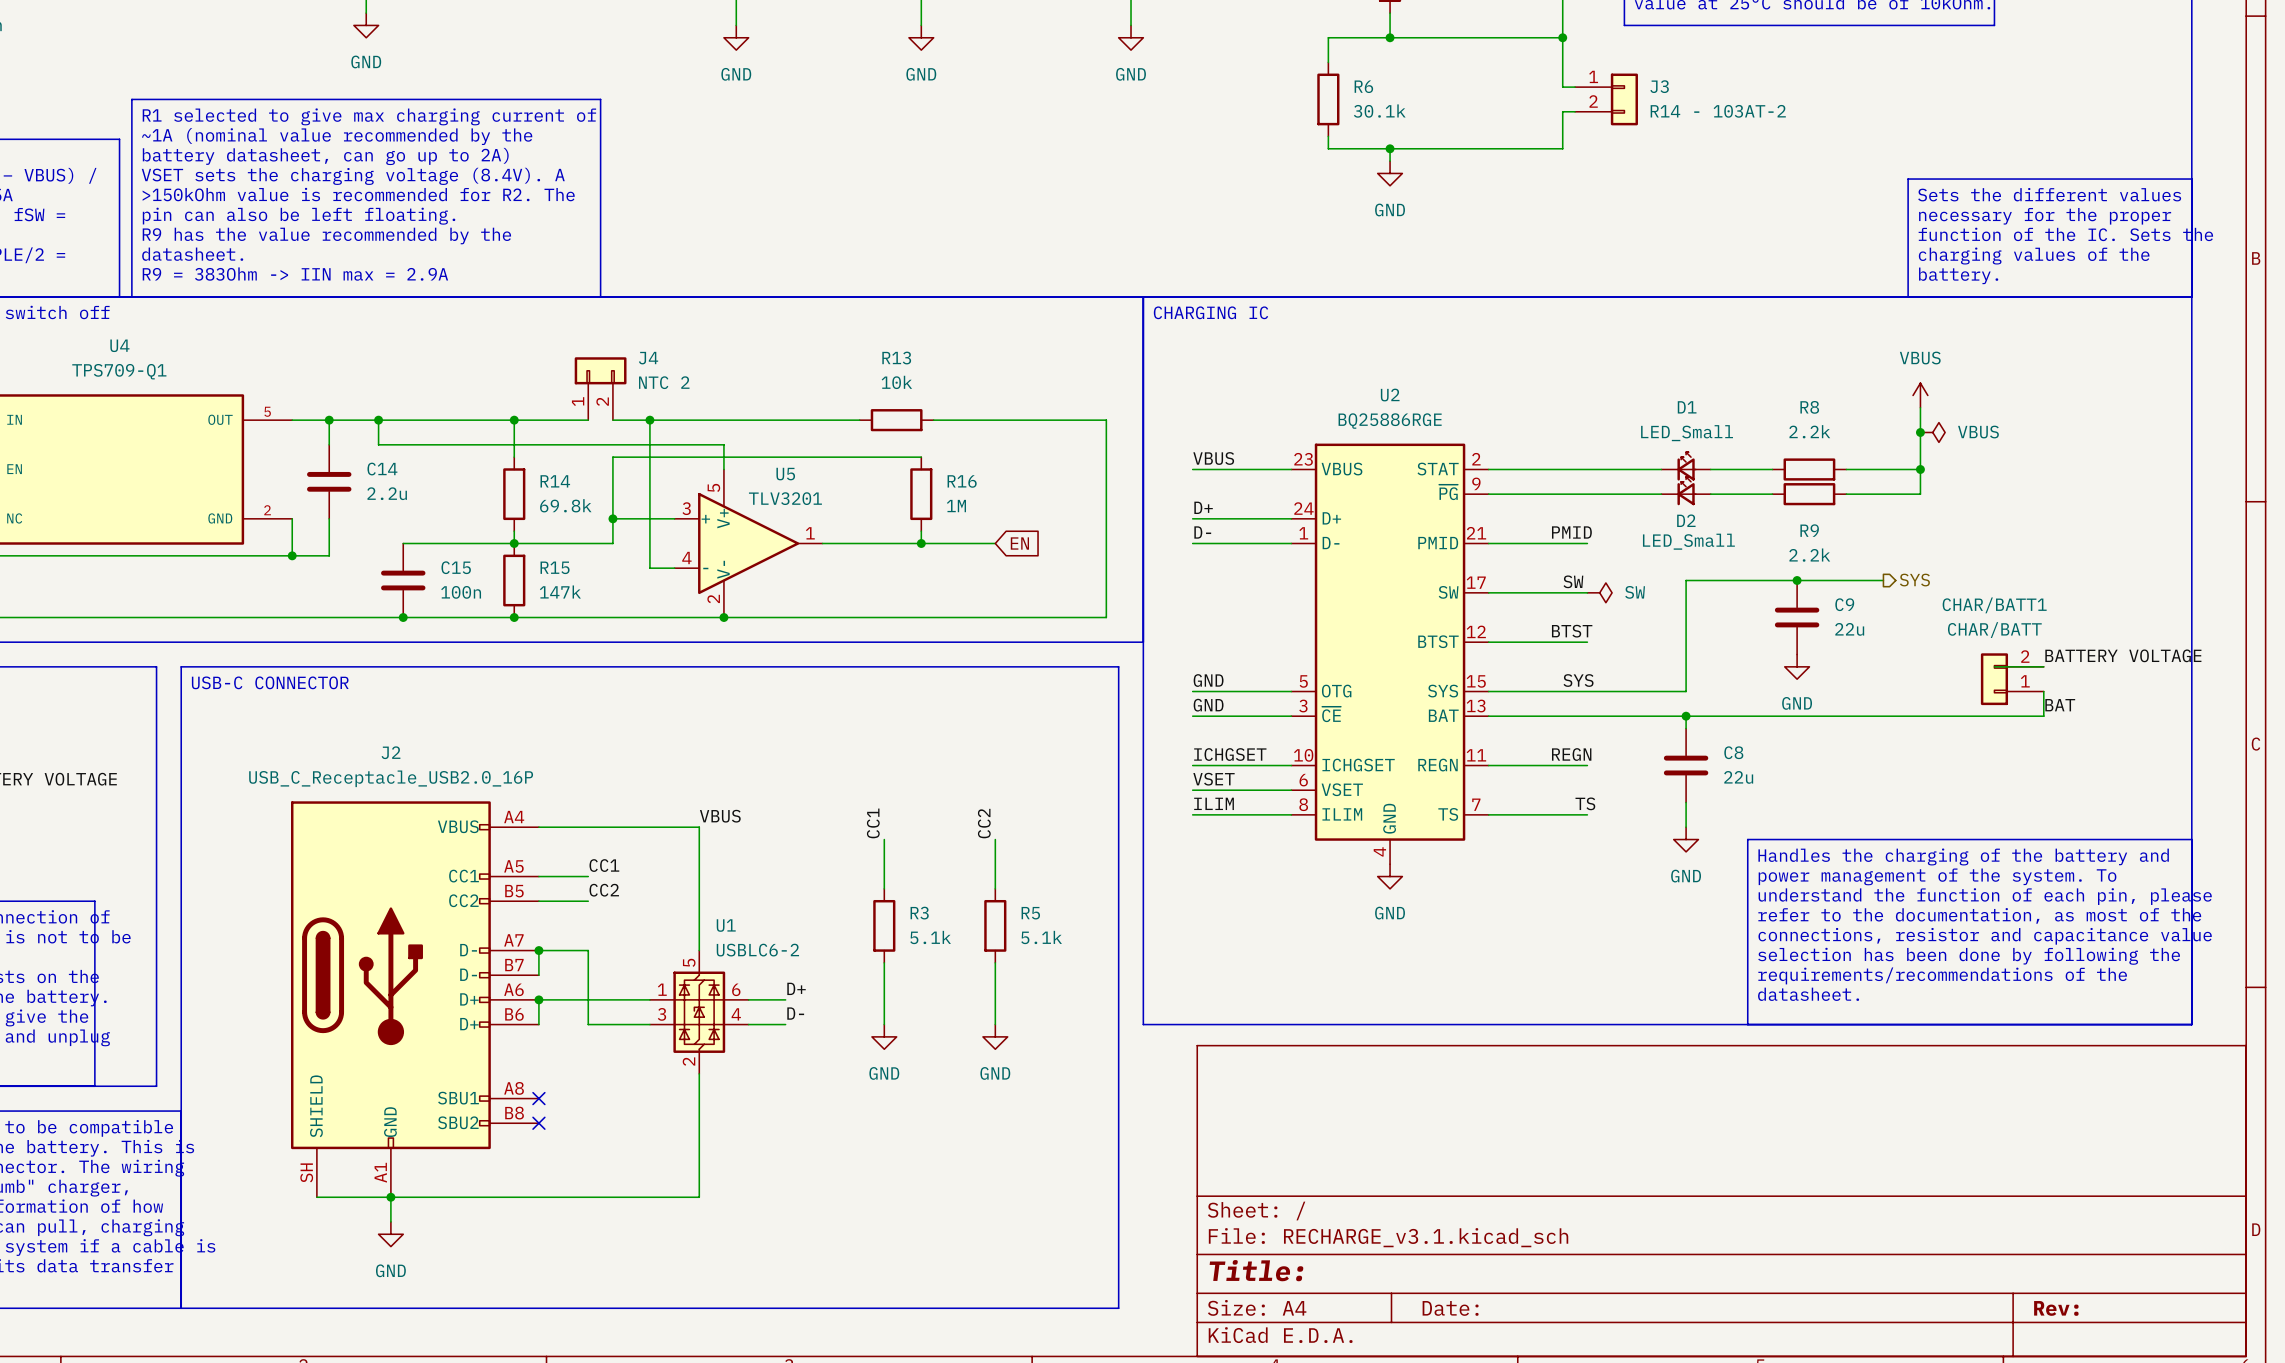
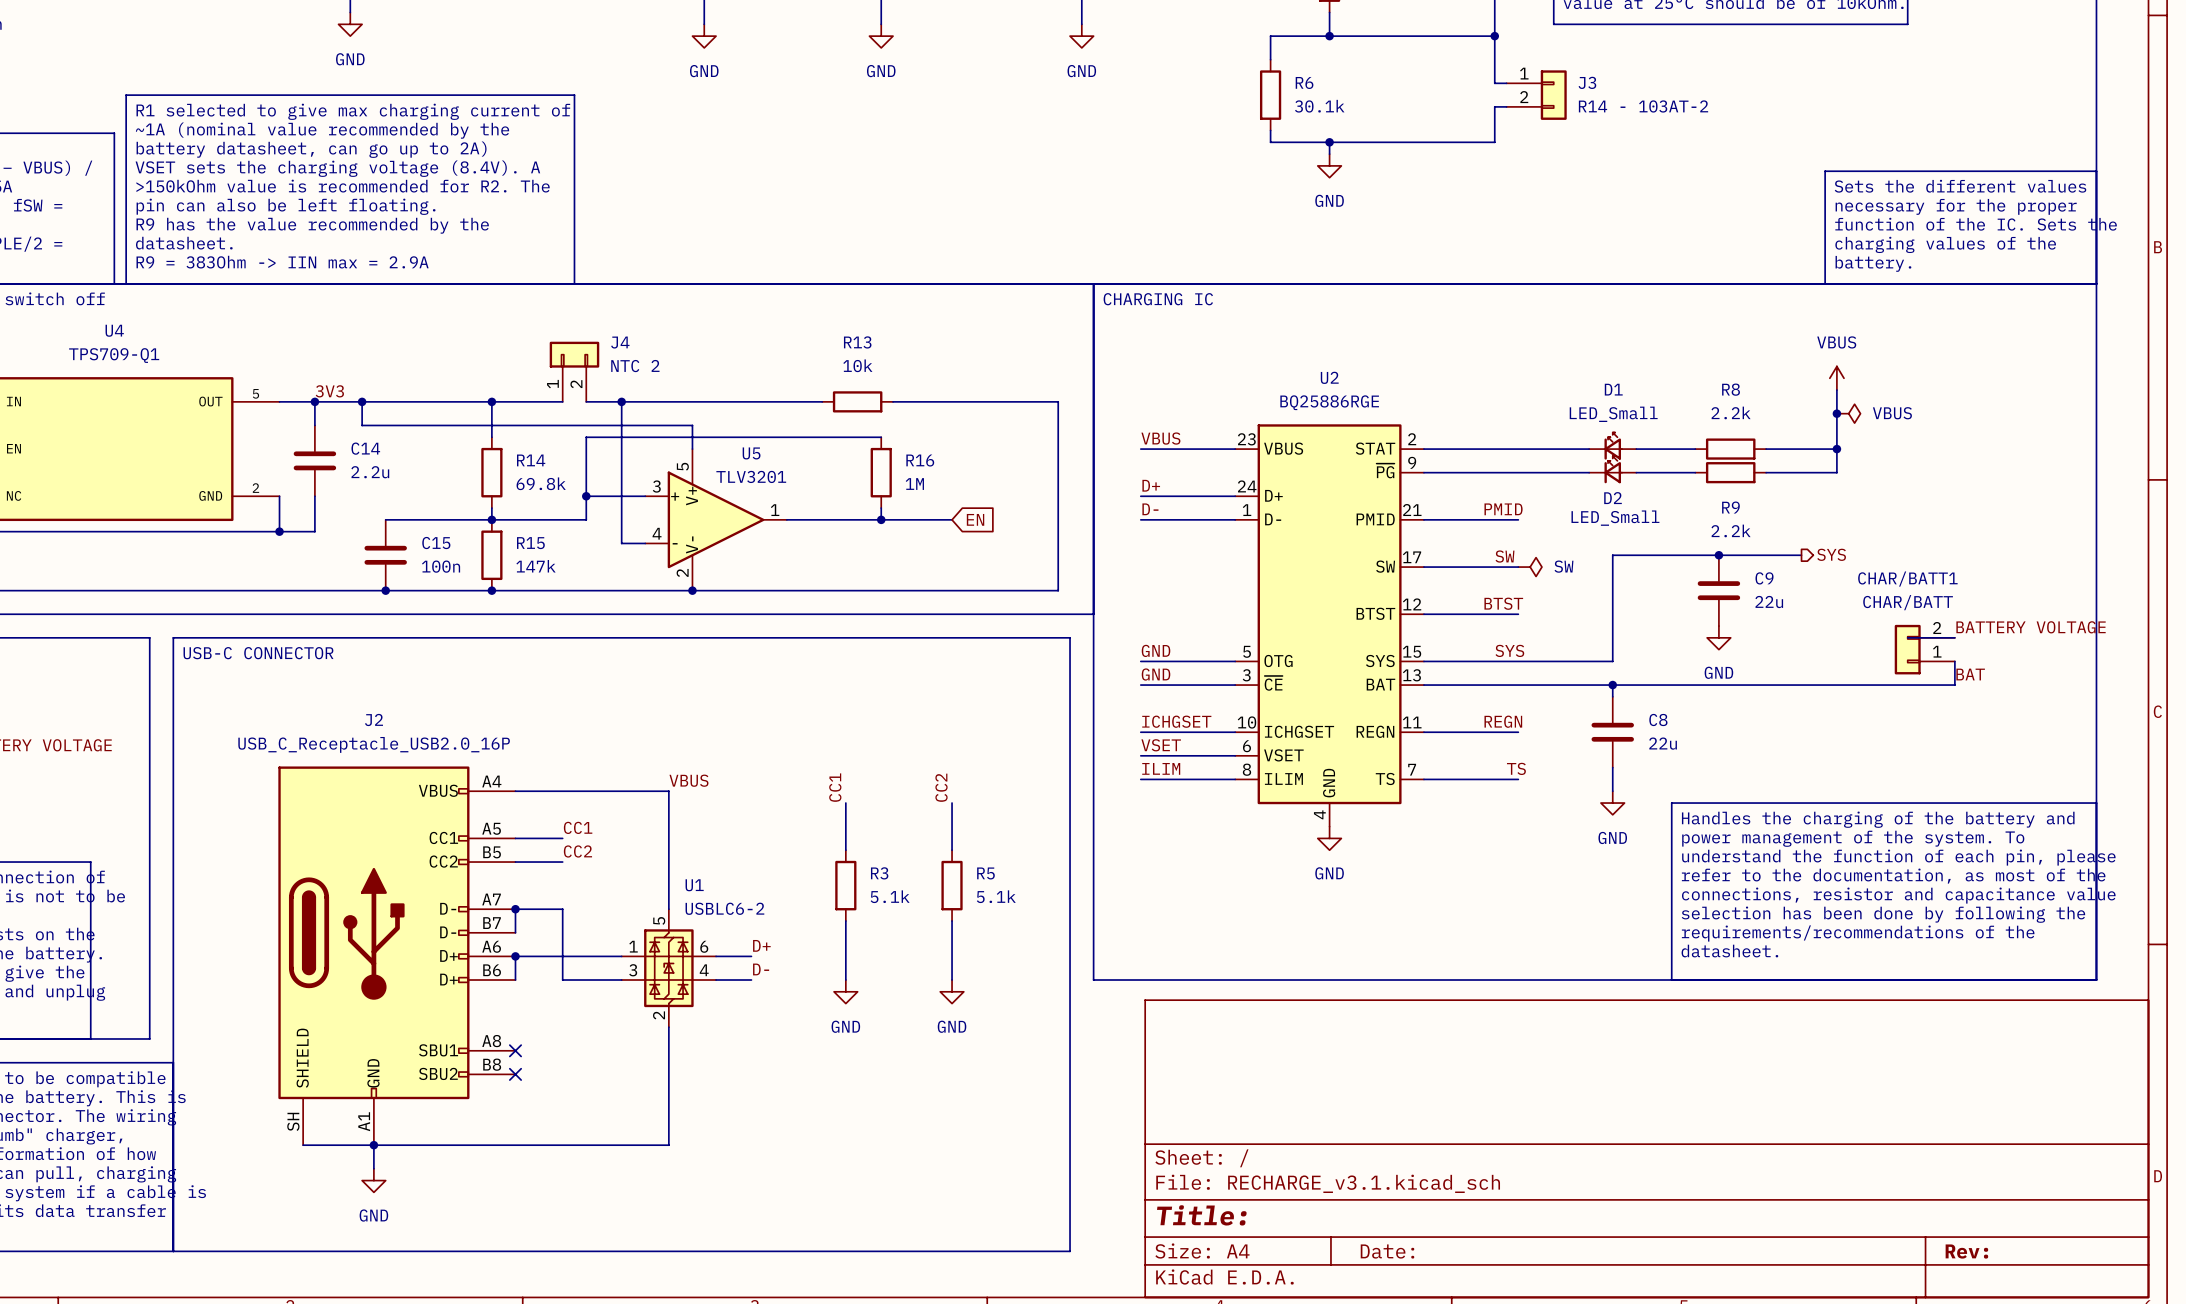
label: none -> 3V3 (329, 391)

